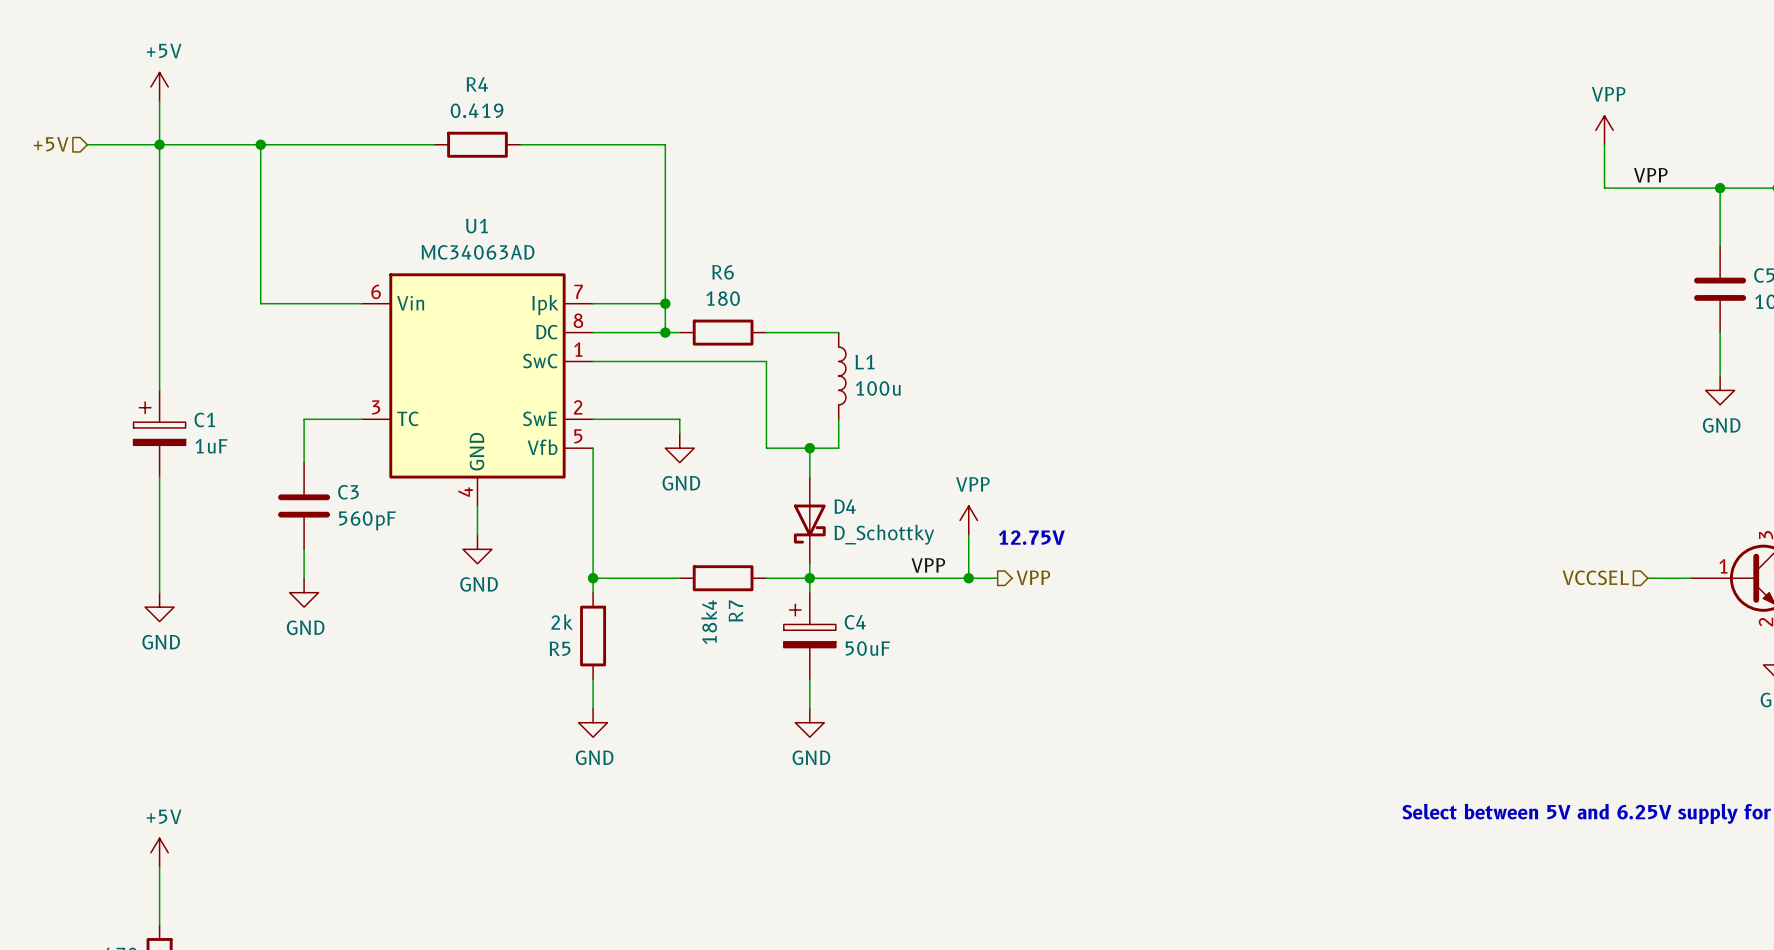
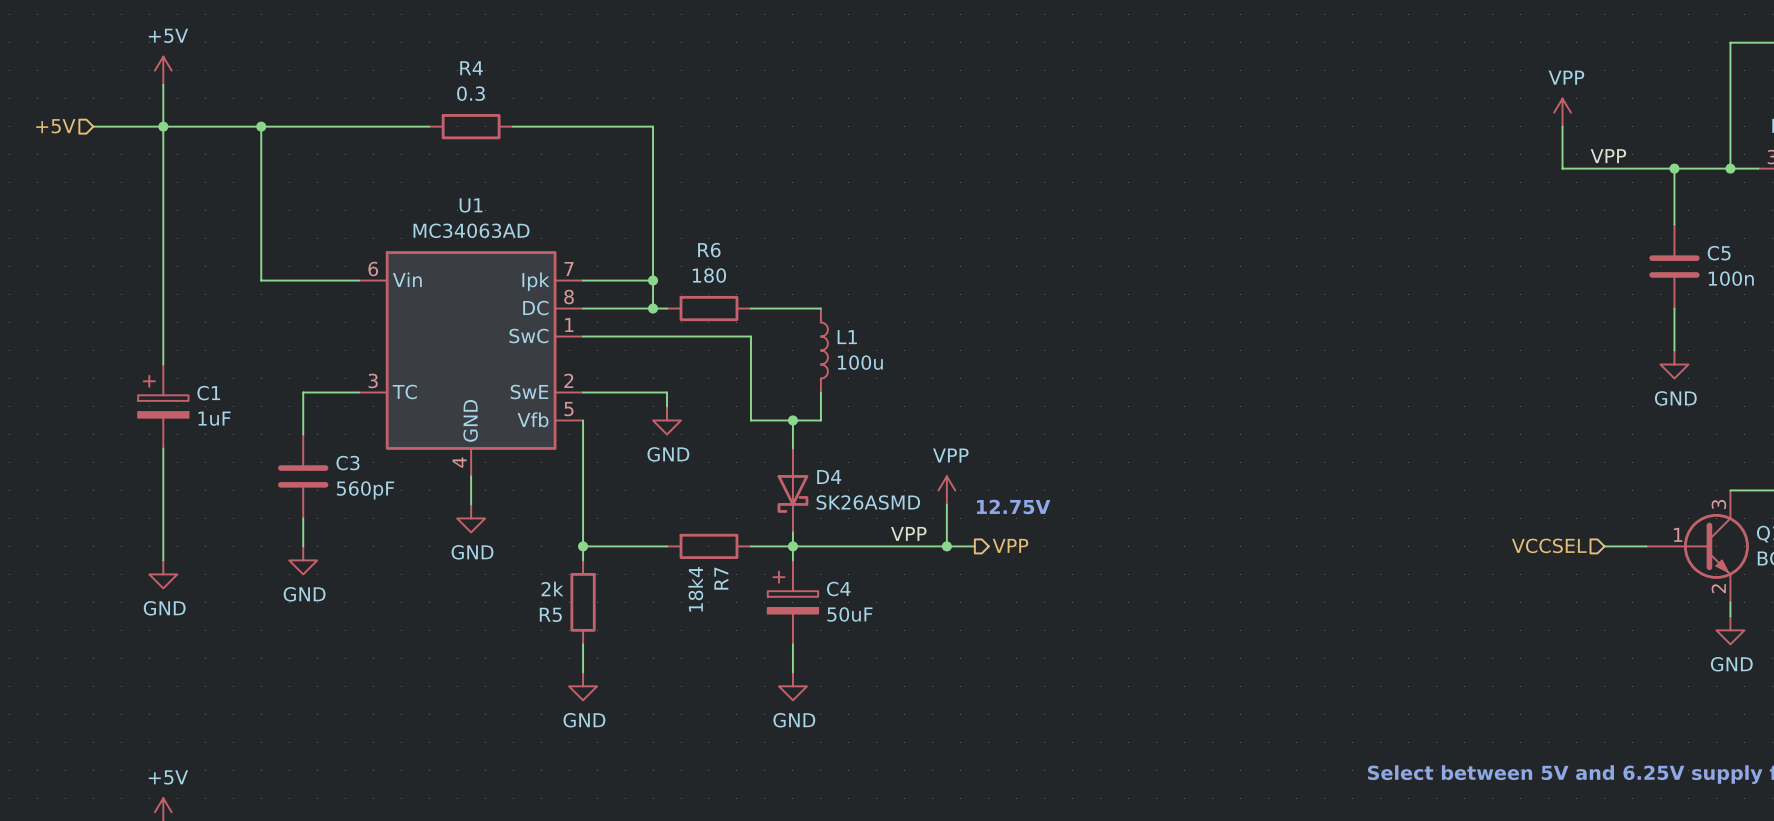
R4 value: 0.419 (477, 110) -> 0.3 (470, 93)
D4 value: D_Schottky (884, 534) -> SK26ASMD (868, 502)

